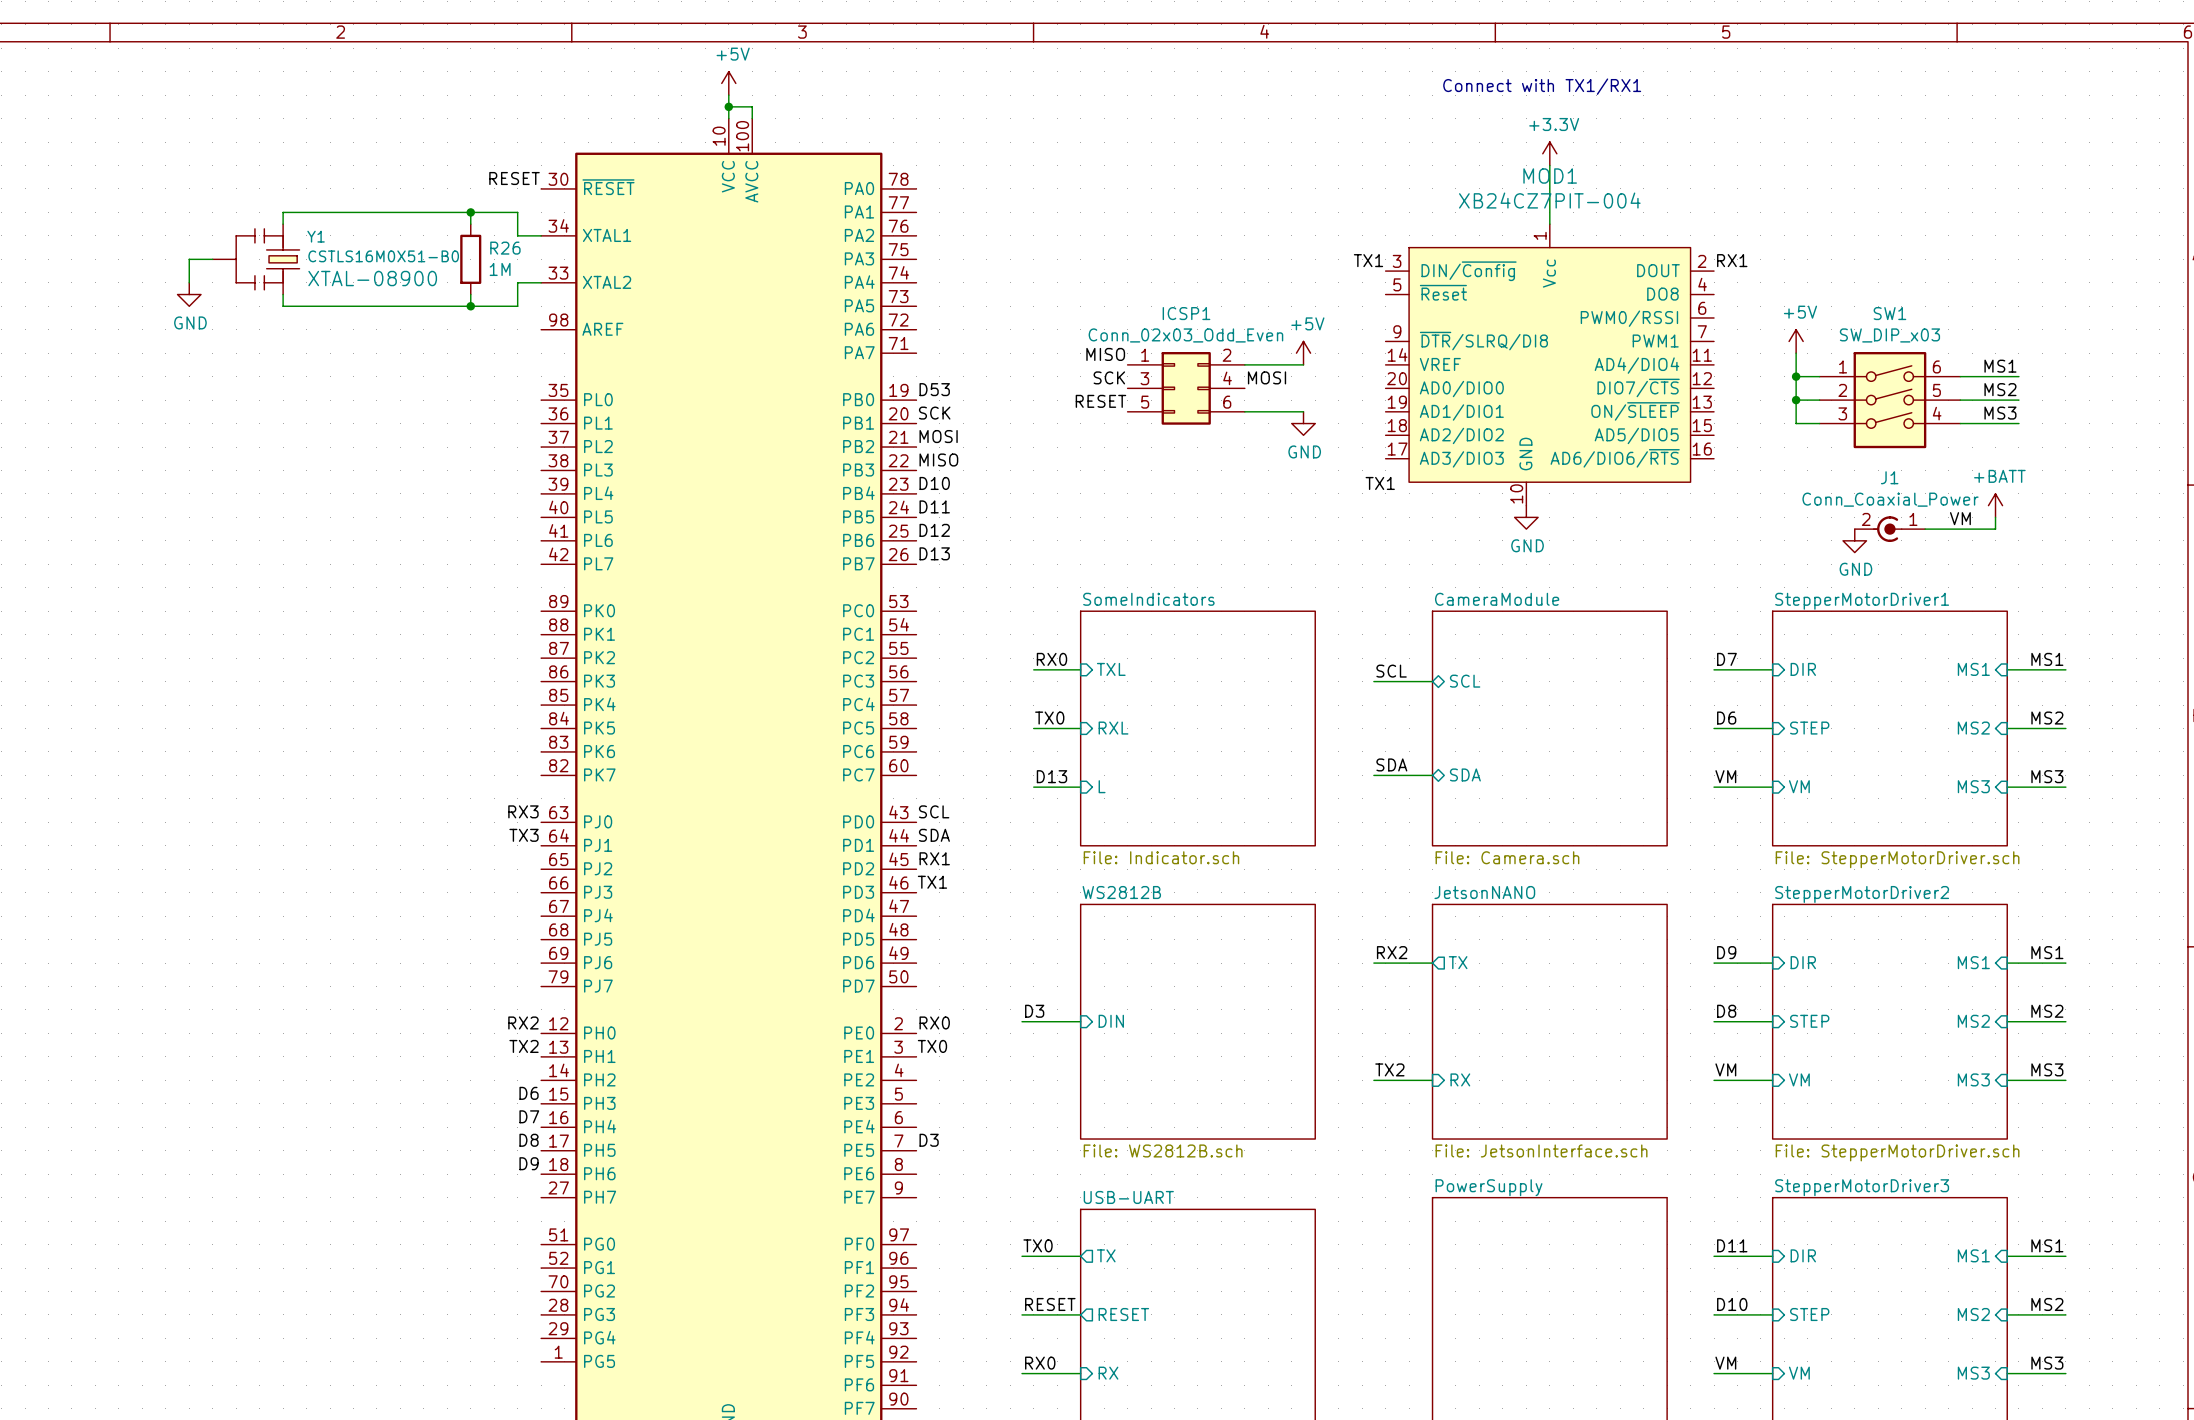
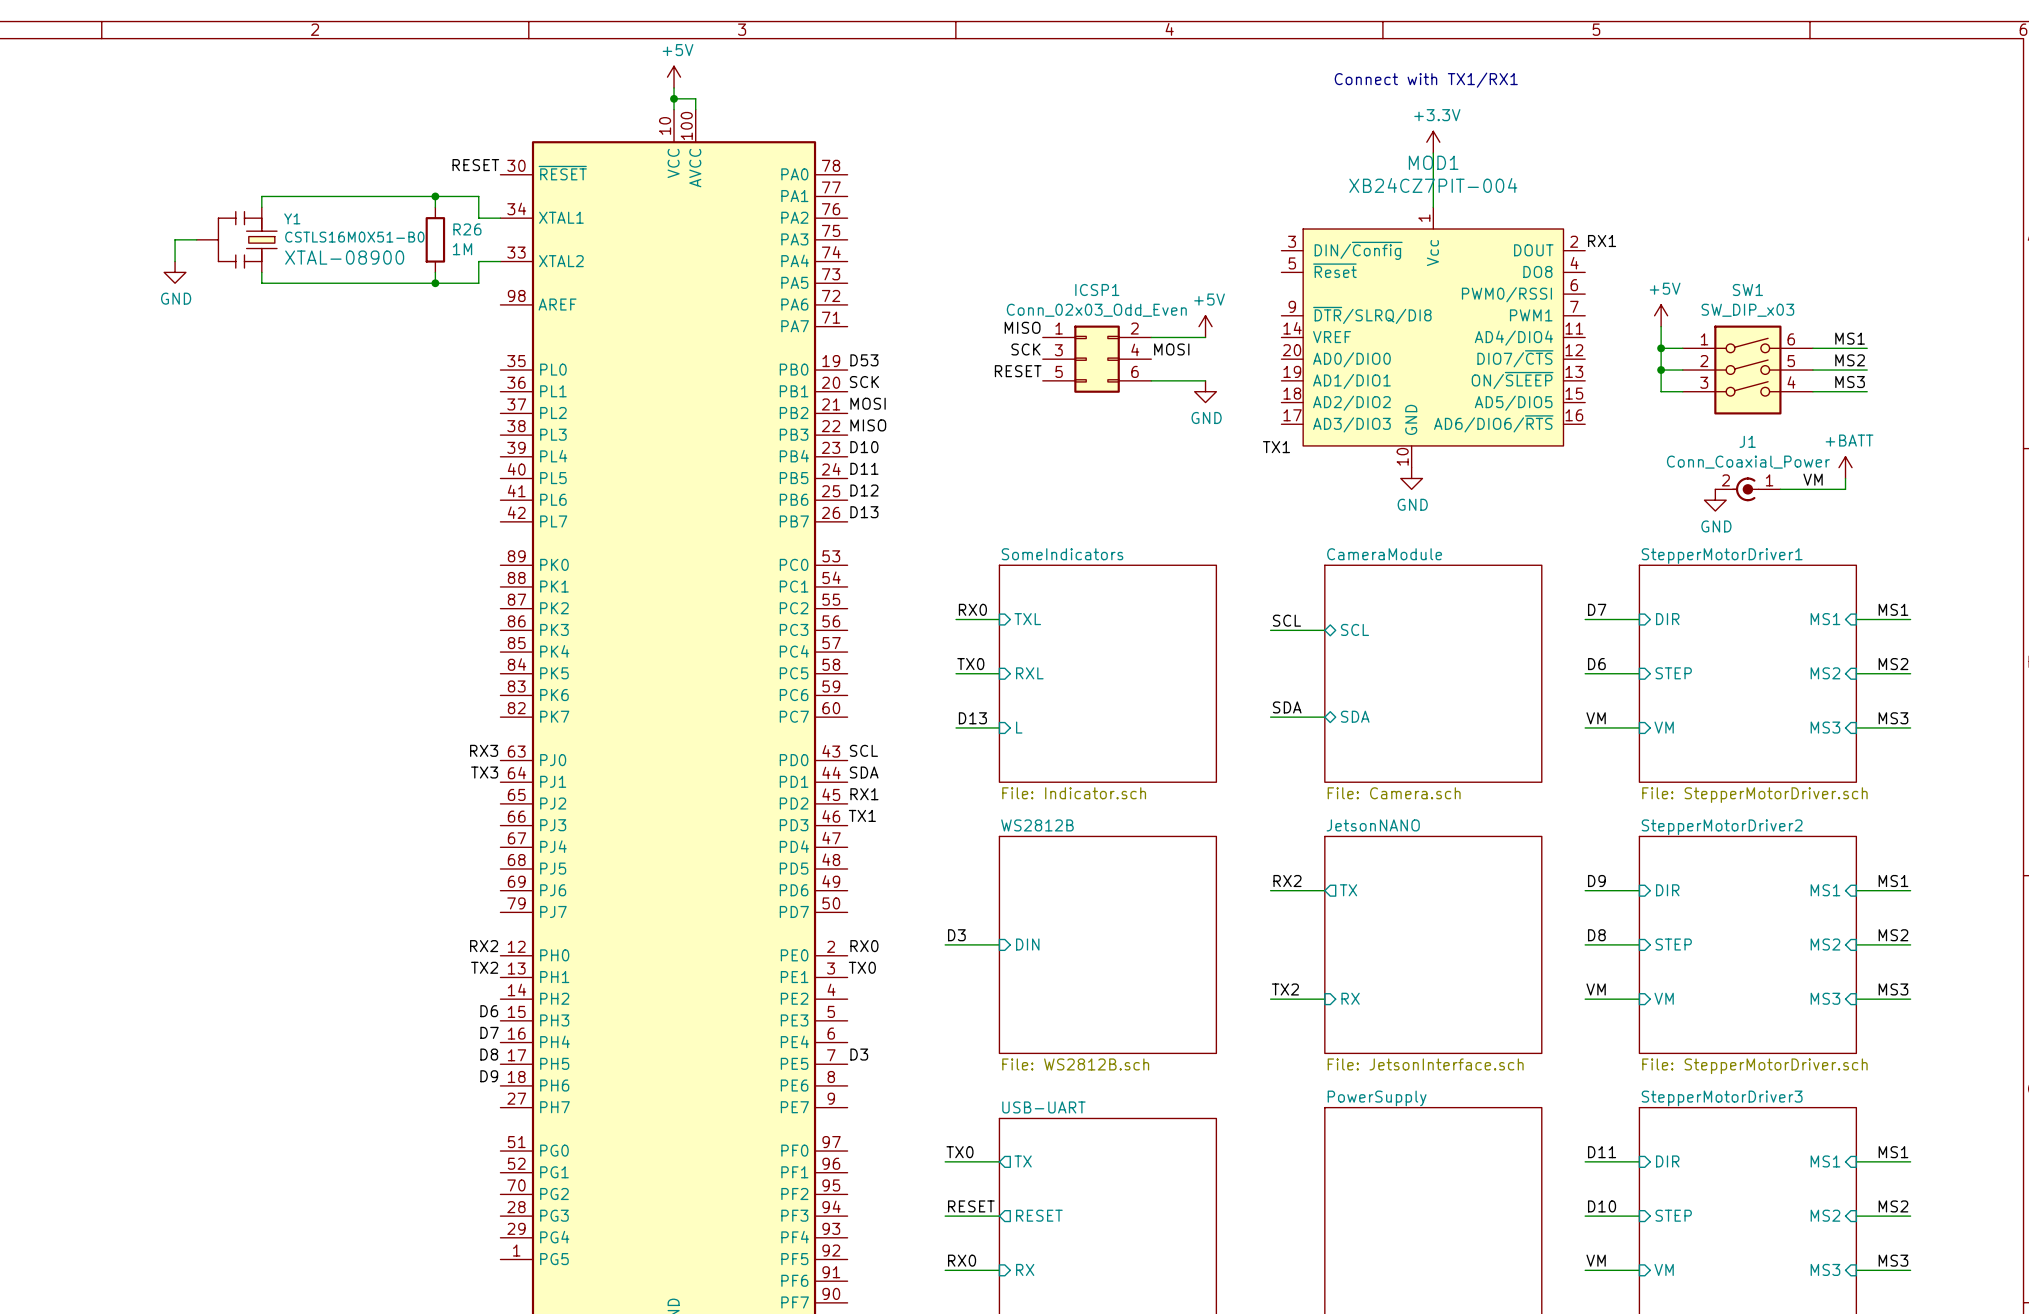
label: TX1 (1368, 260) -> none

